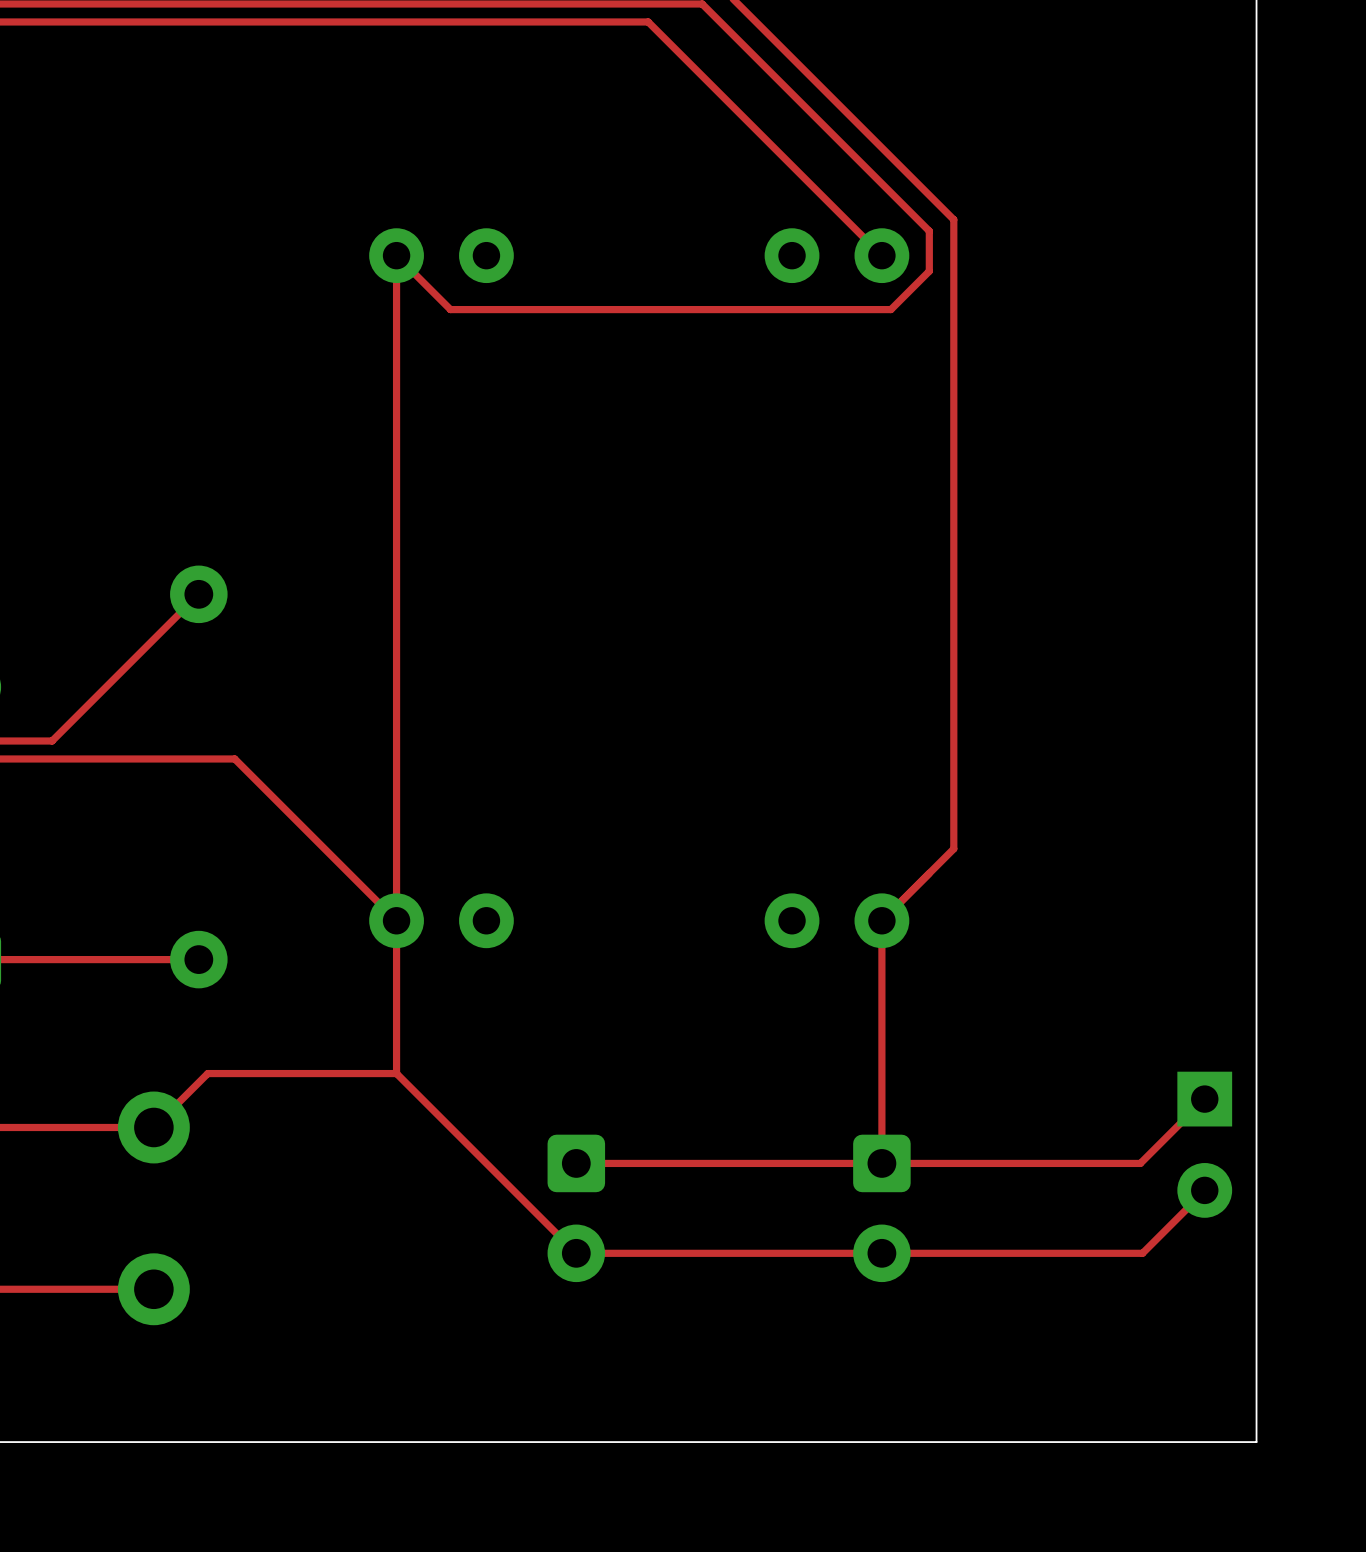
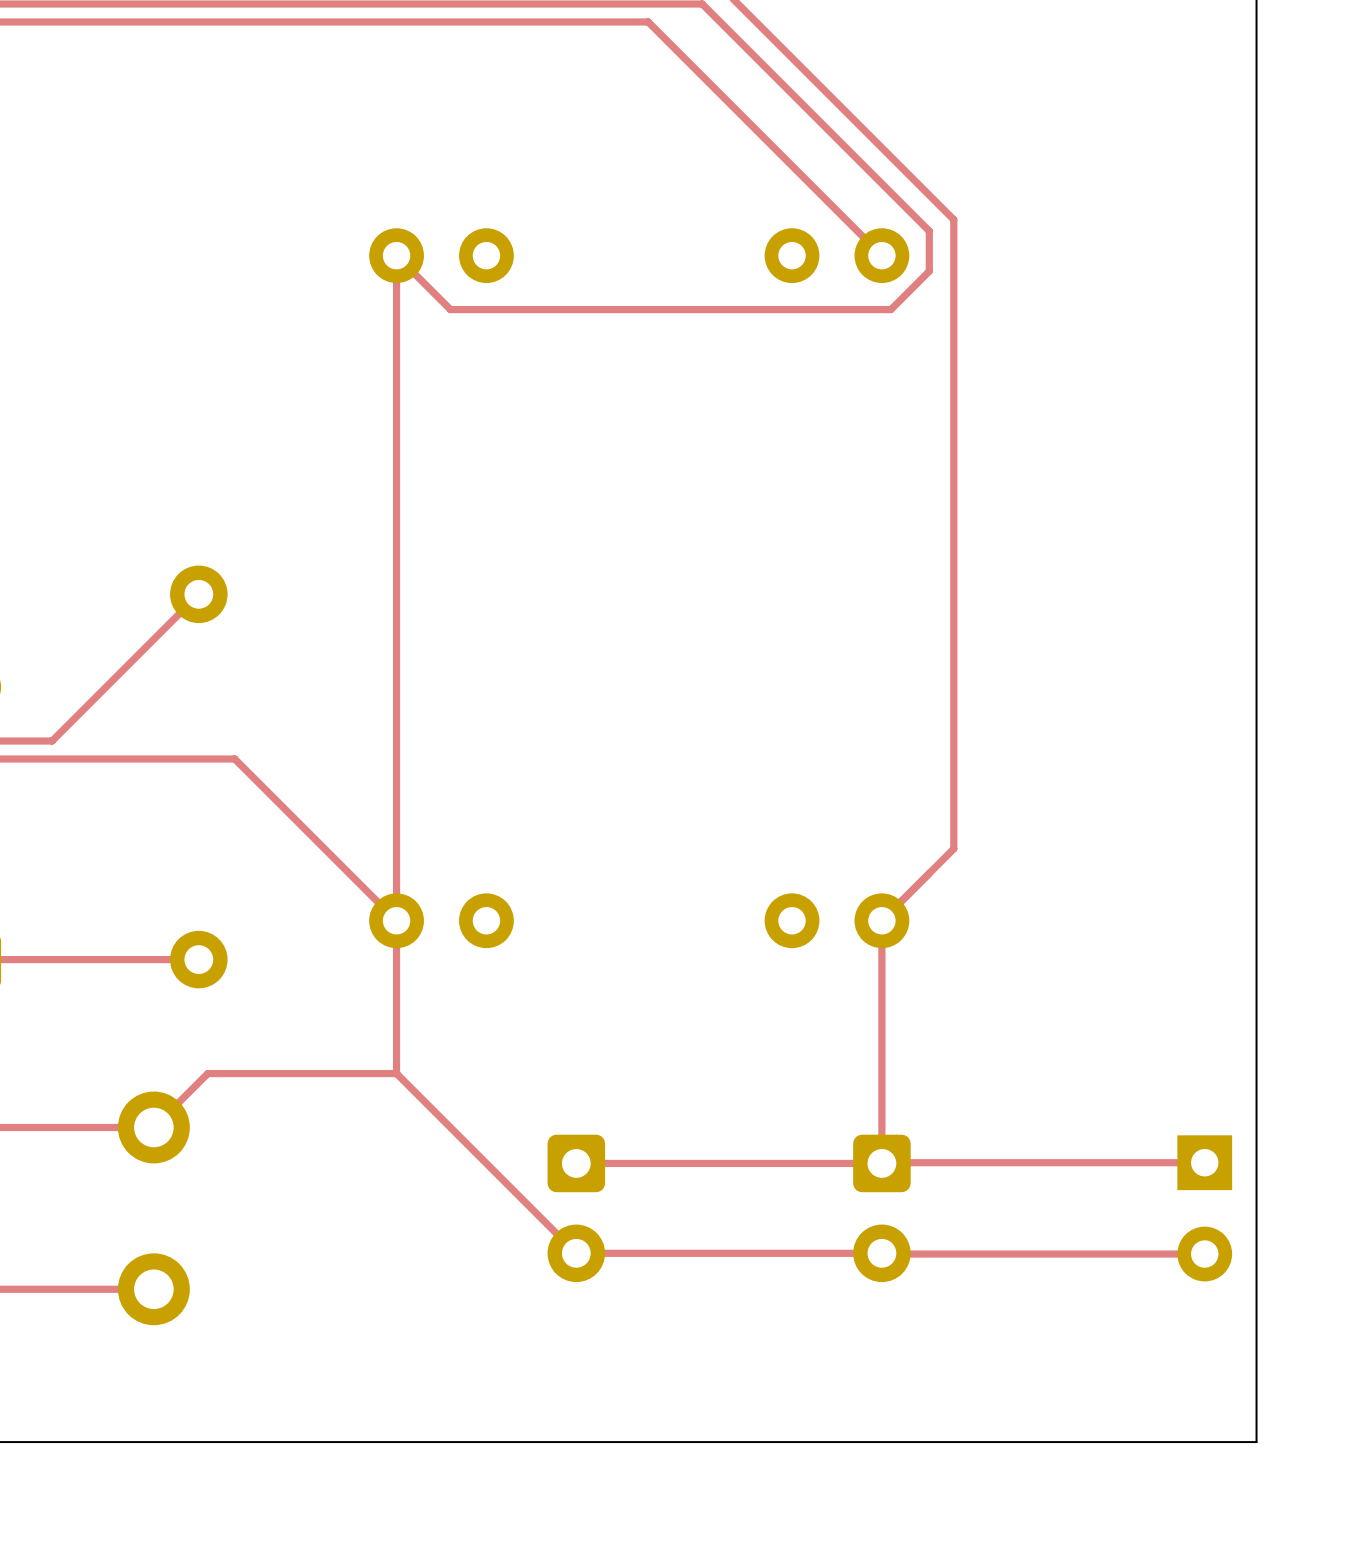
top track: (1204, 1099) (1140, 1163) (881, 1163) -> (1204, 1162) (881, 1163)
part position: (1204, 1144) -> (1204, 1208)
top track: (1204, 1191) (1142, 1253) (881, 1253) -> (1204, 1254) (882, 1254)

